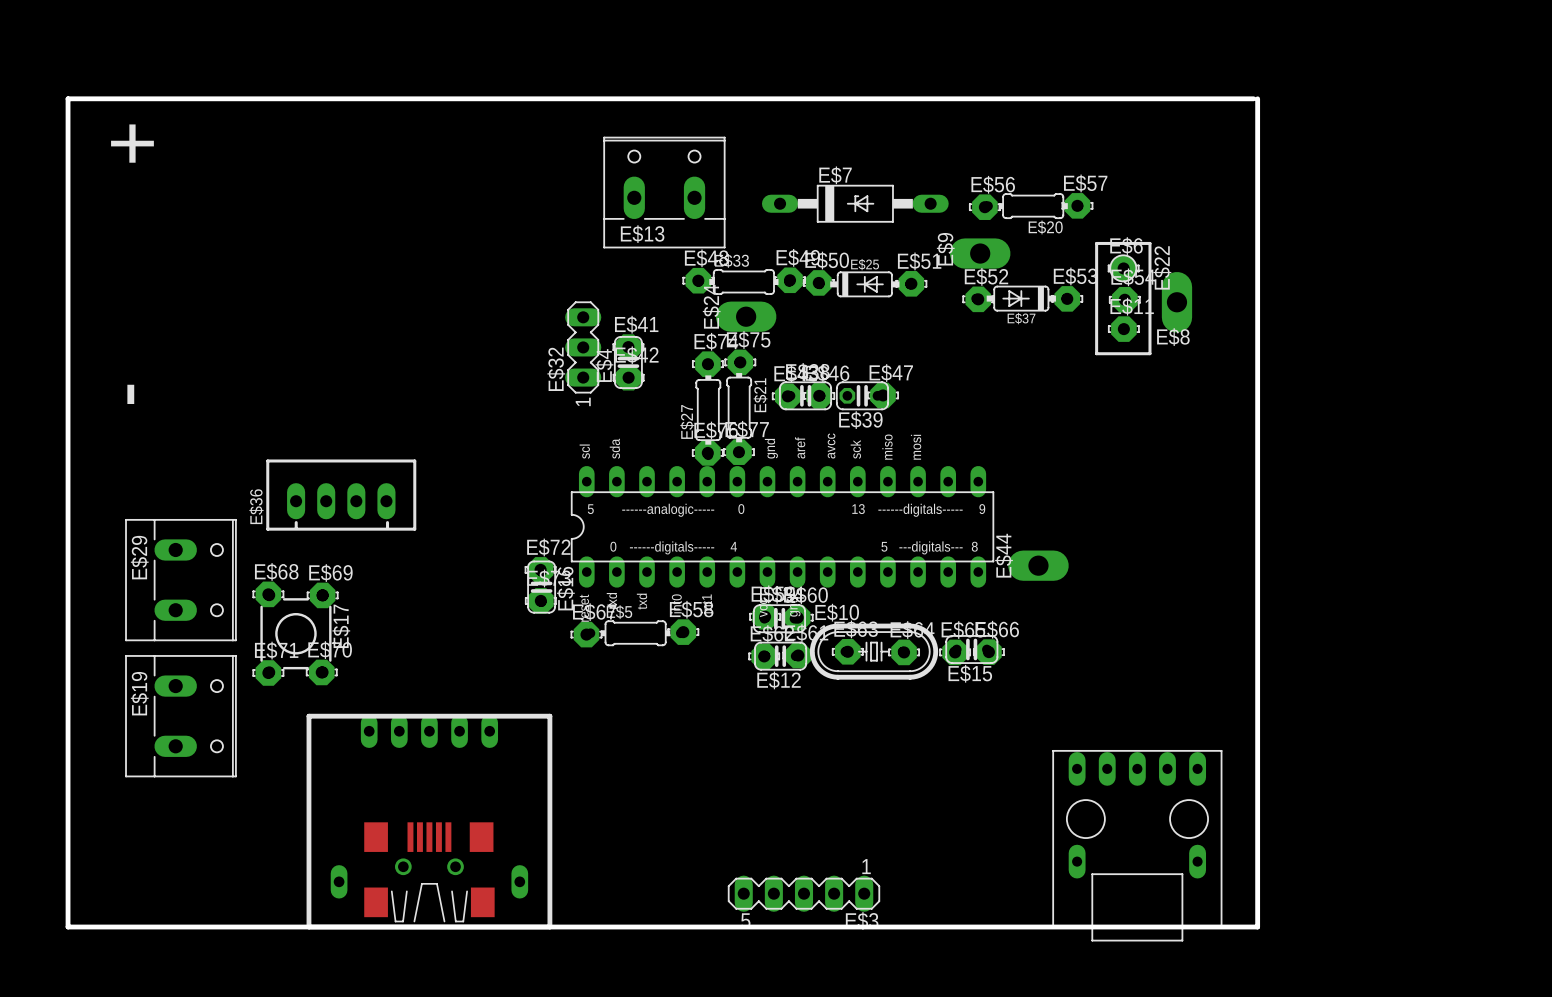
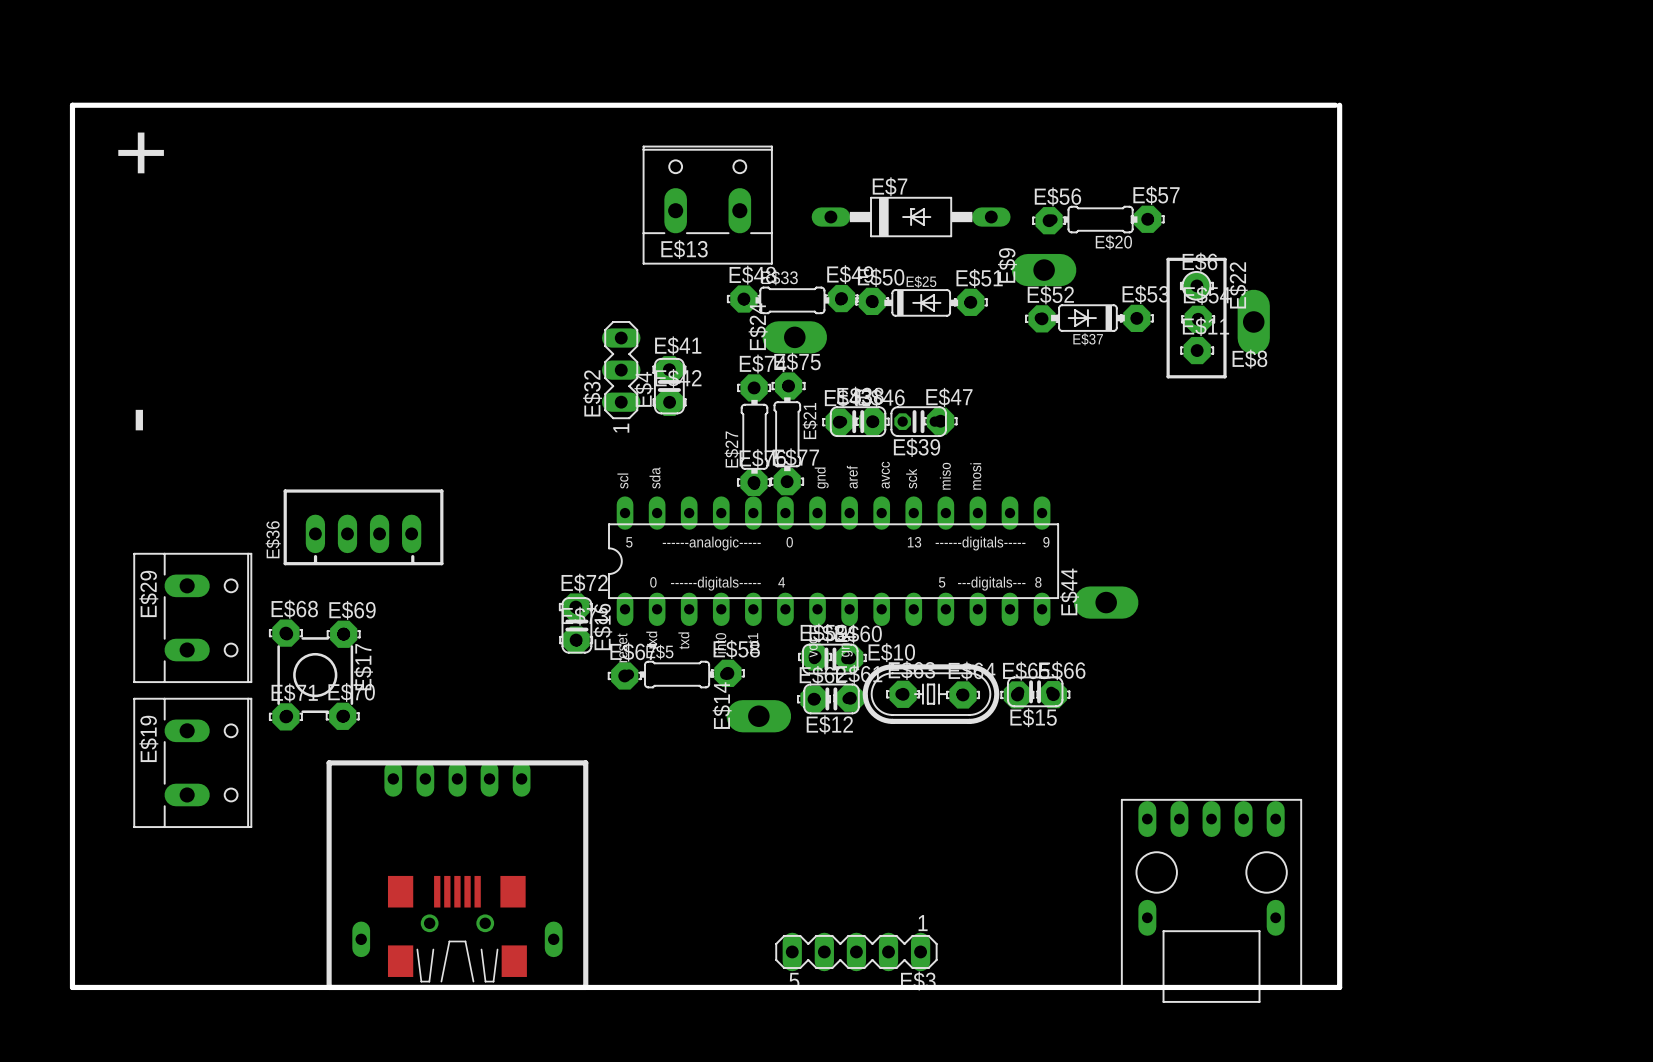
E$14: none -> (758, 716)

